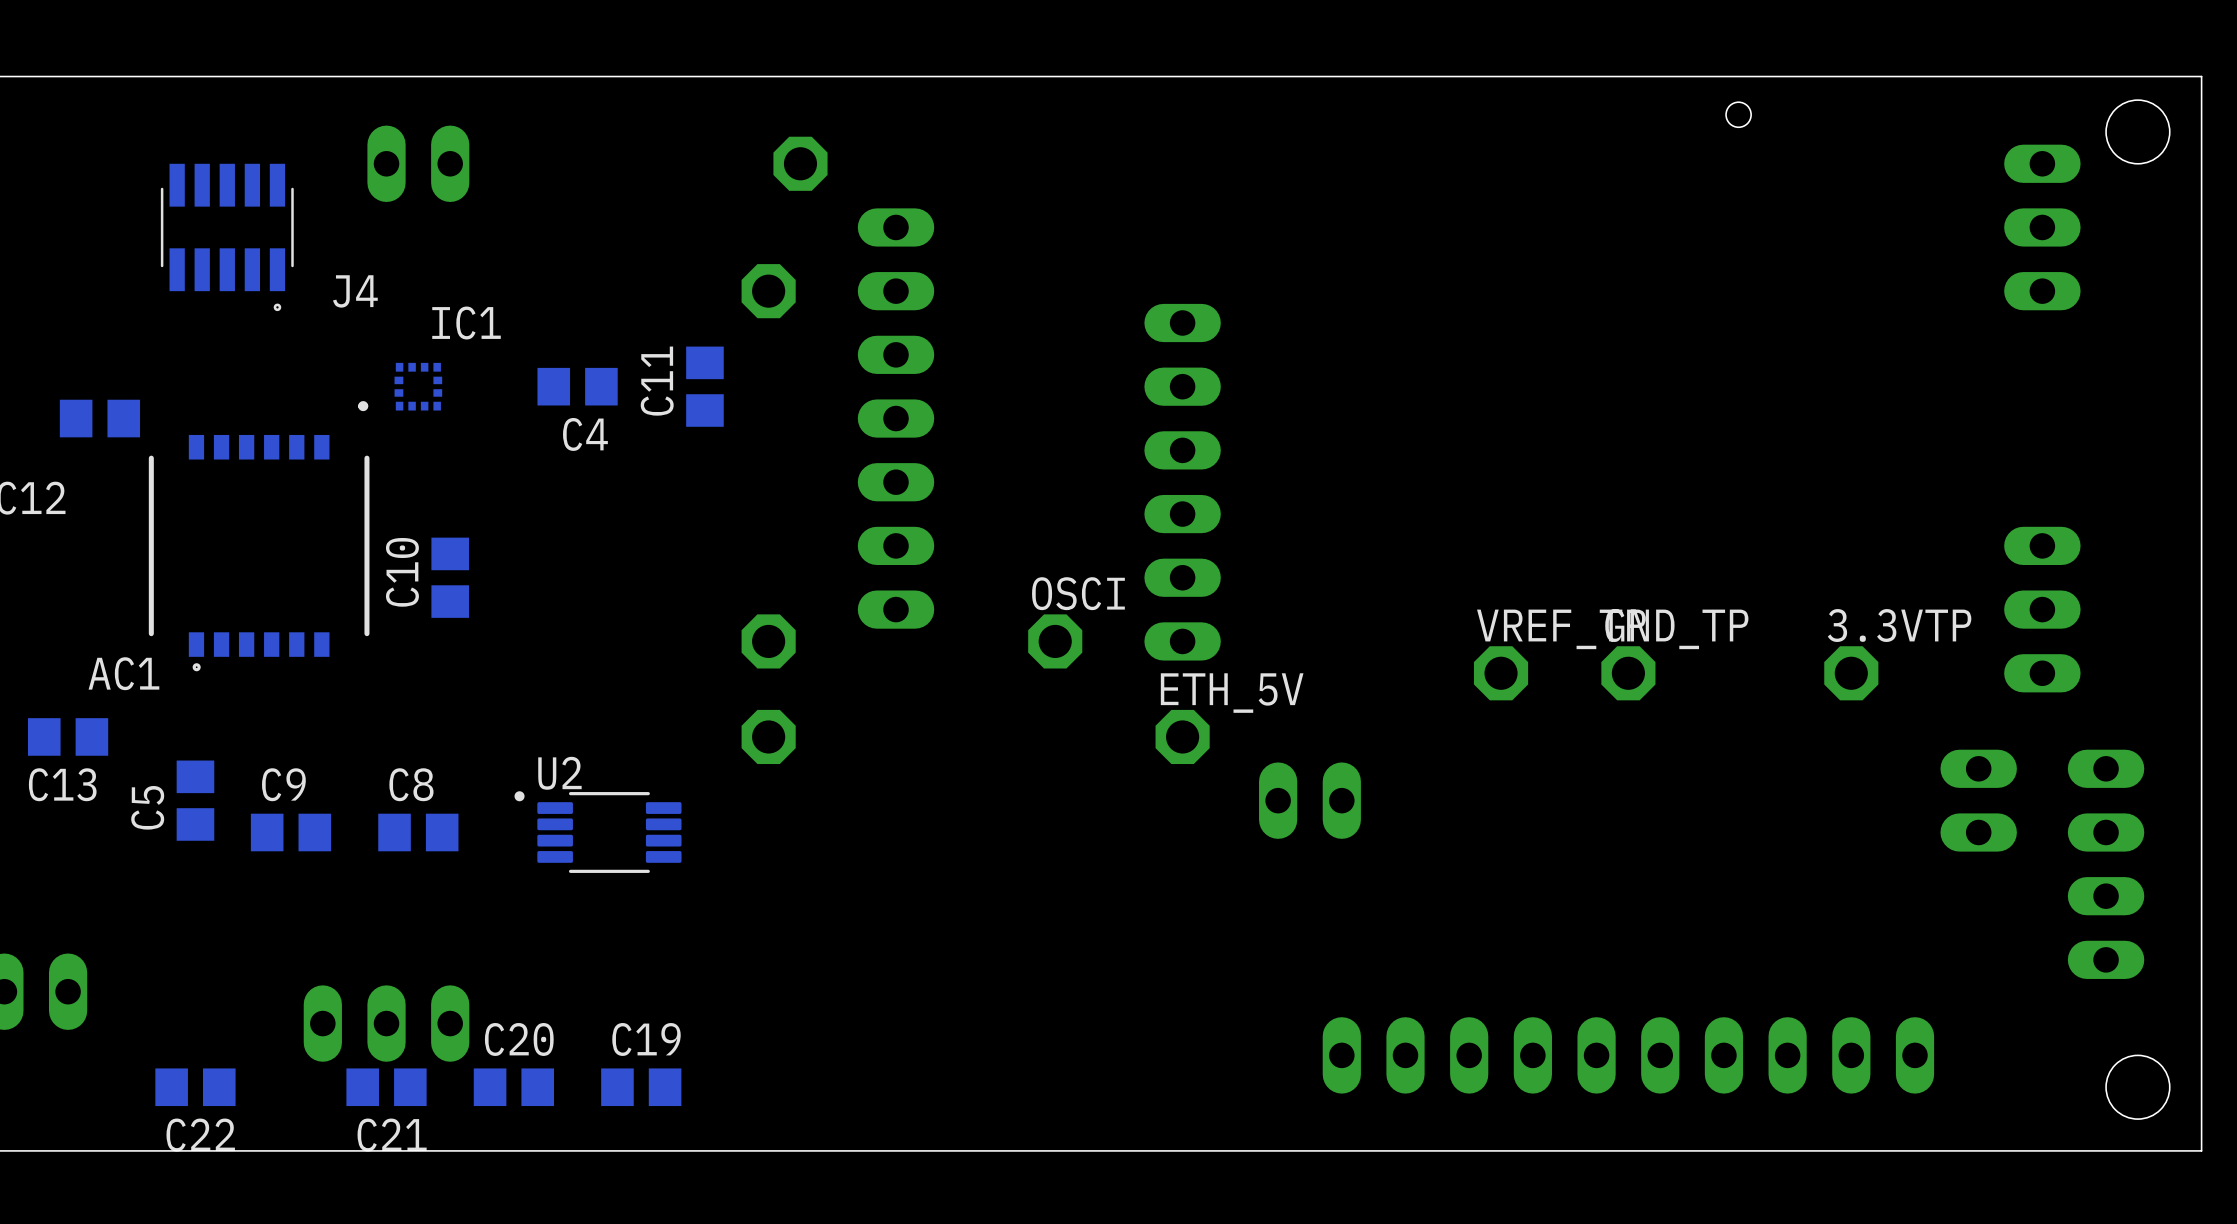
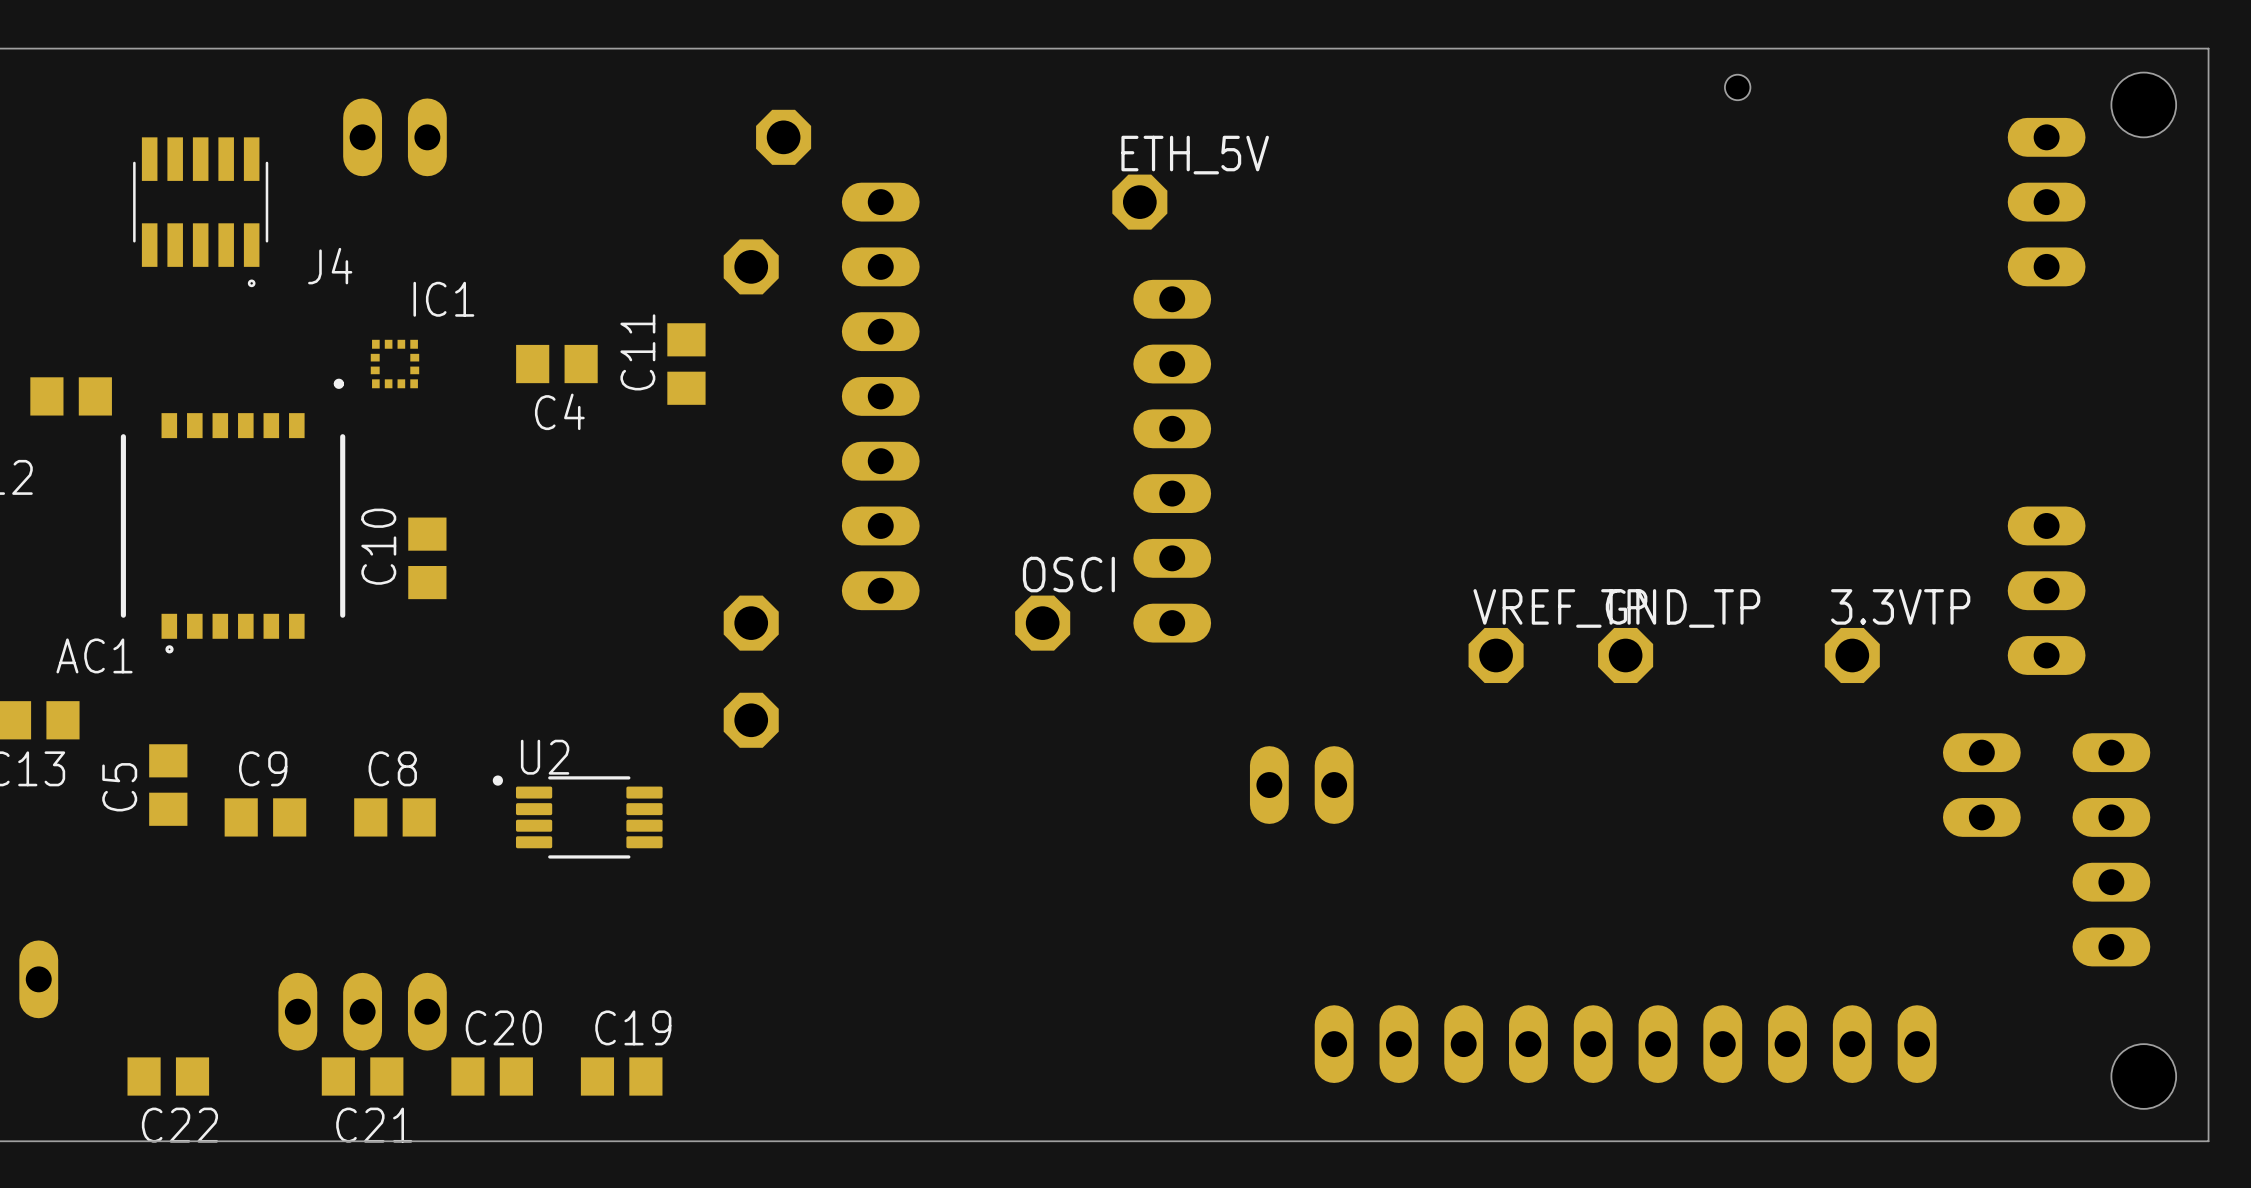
ETH_5V position: (1182, 736) -> (1139, 202)

